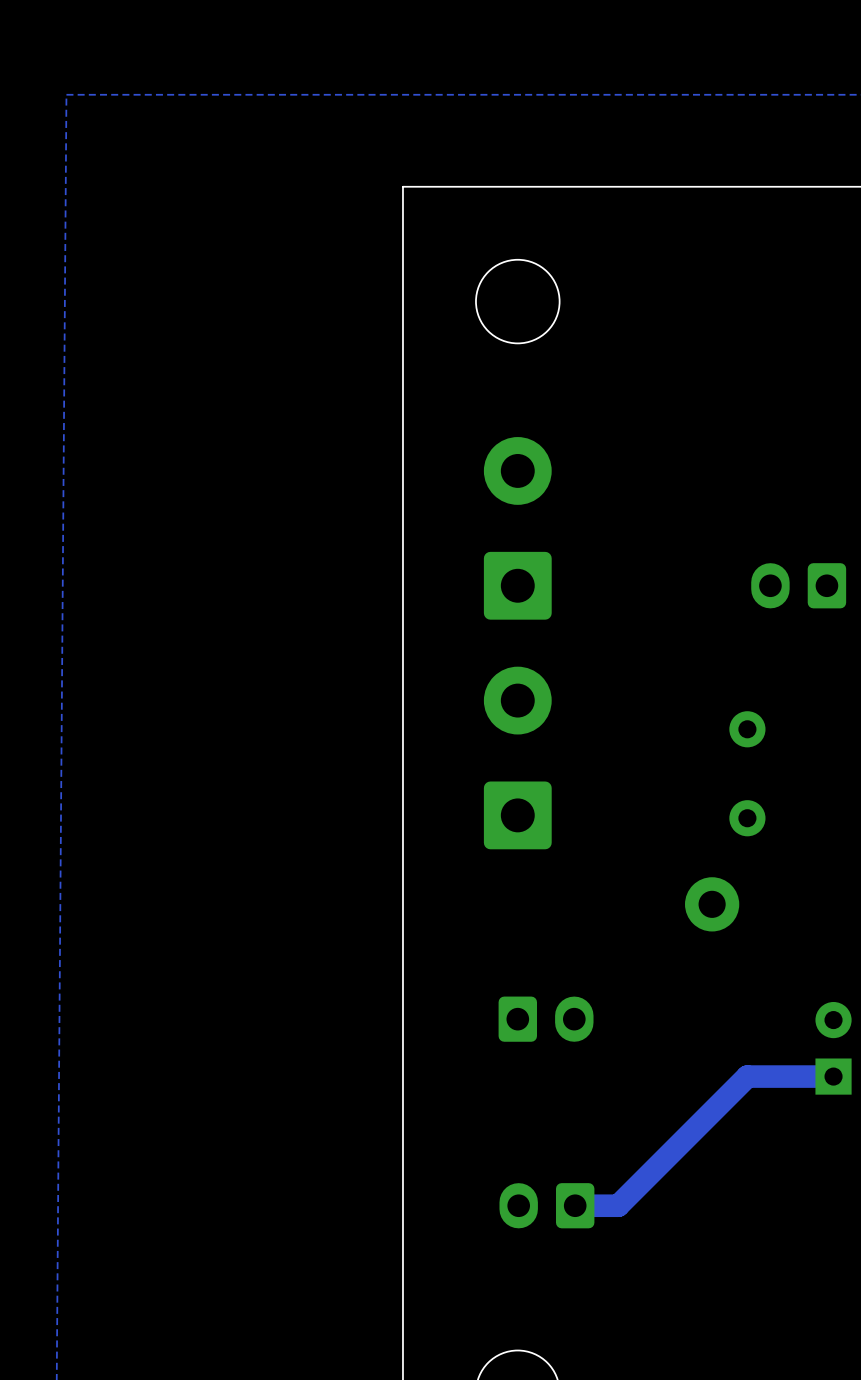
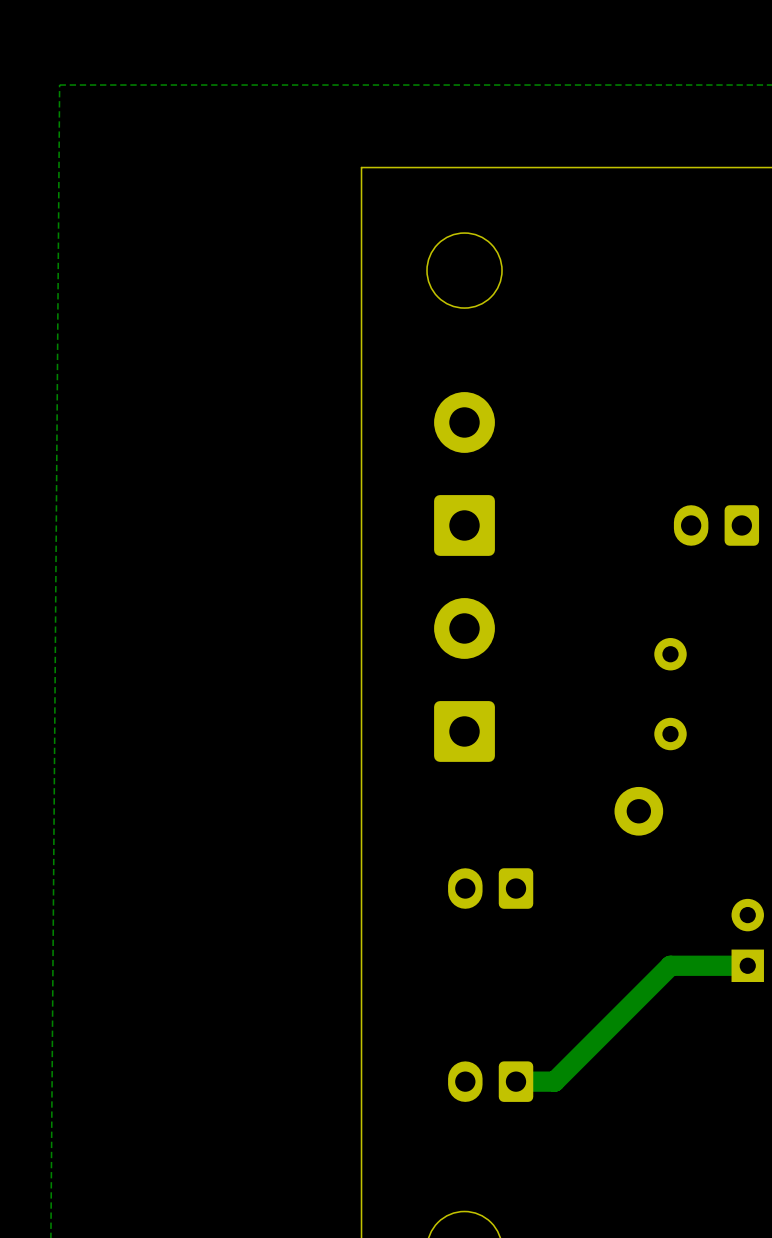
part rotation: 0° (546, 1019) -> 180° (490, 888)

